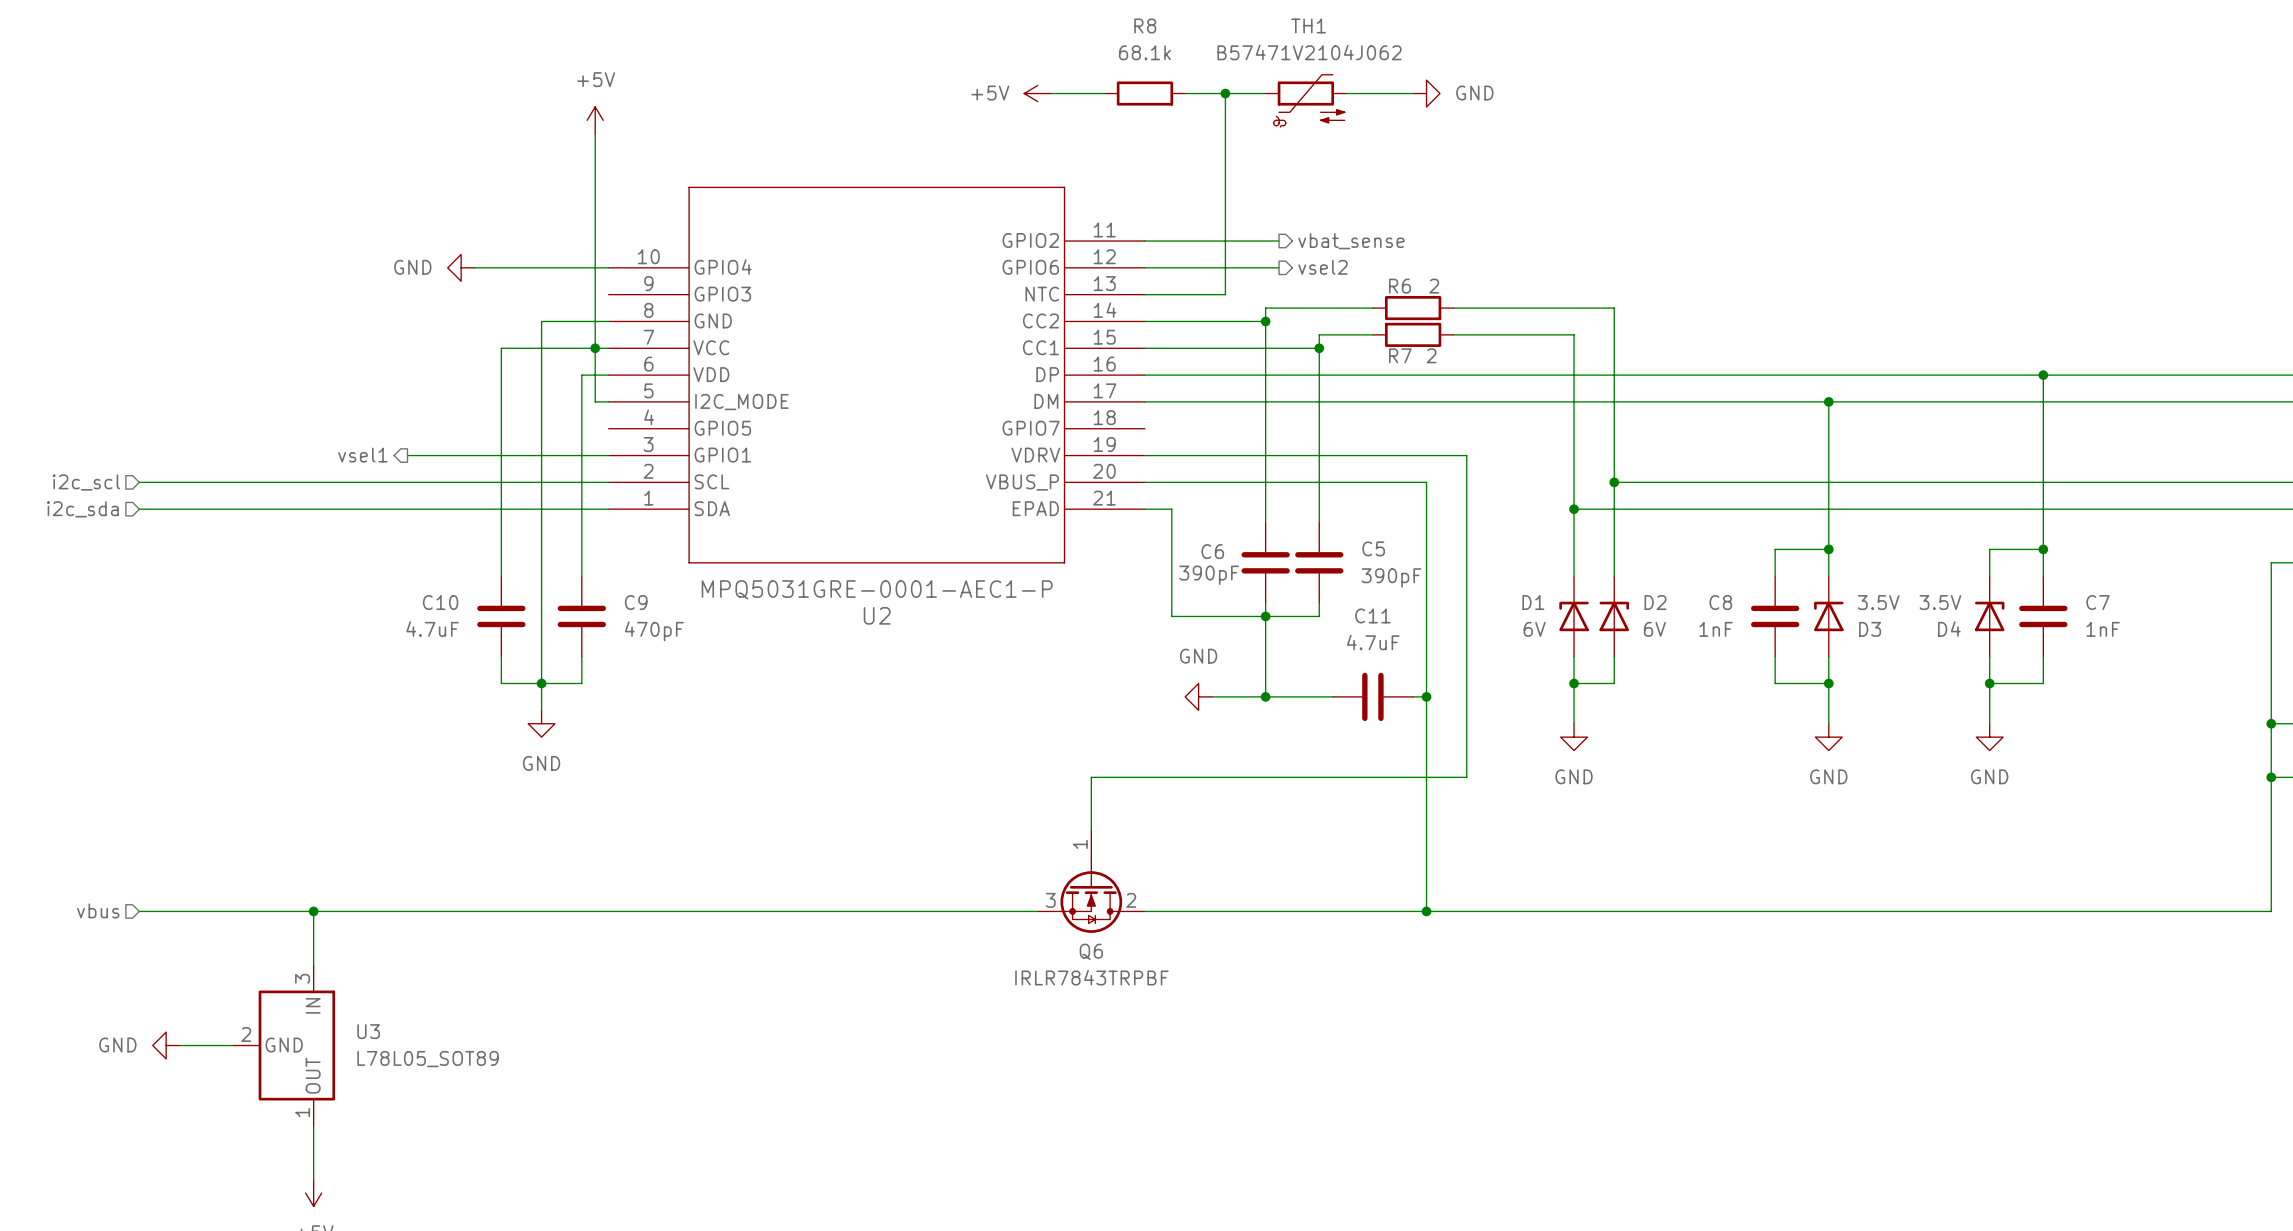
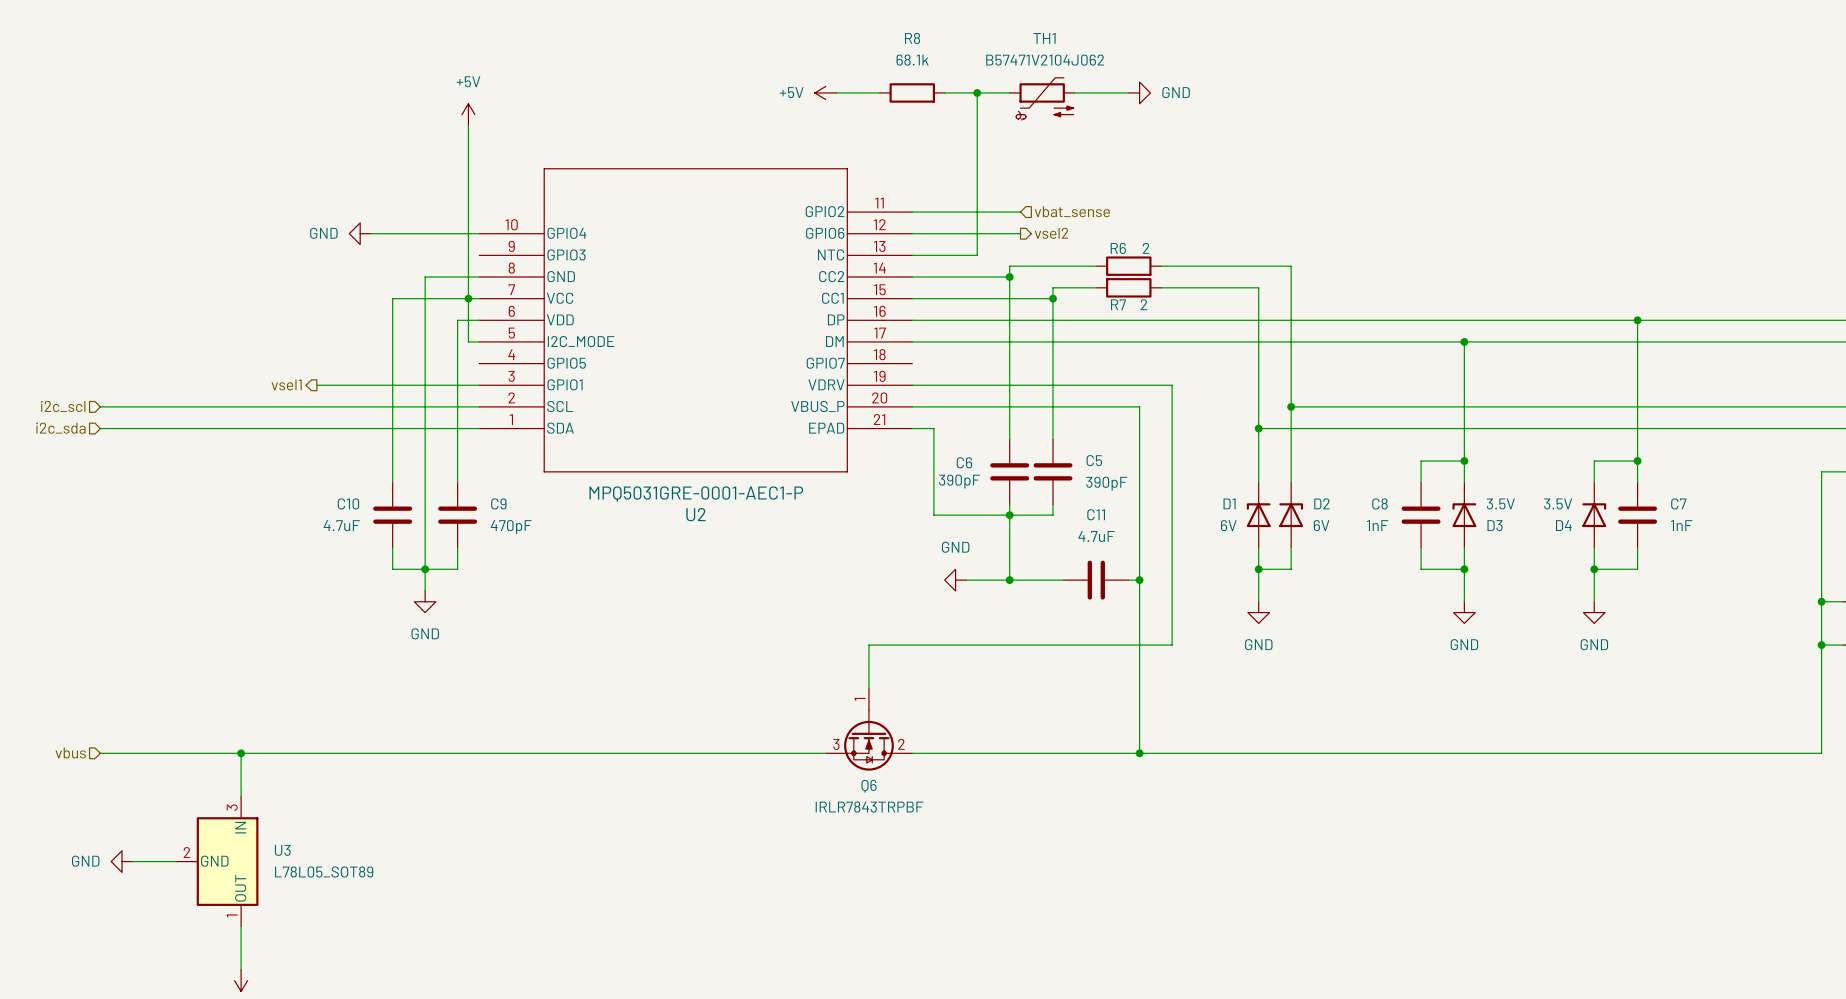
hierarchical label shape: output (1351, 241) -> input (1072, 211)

